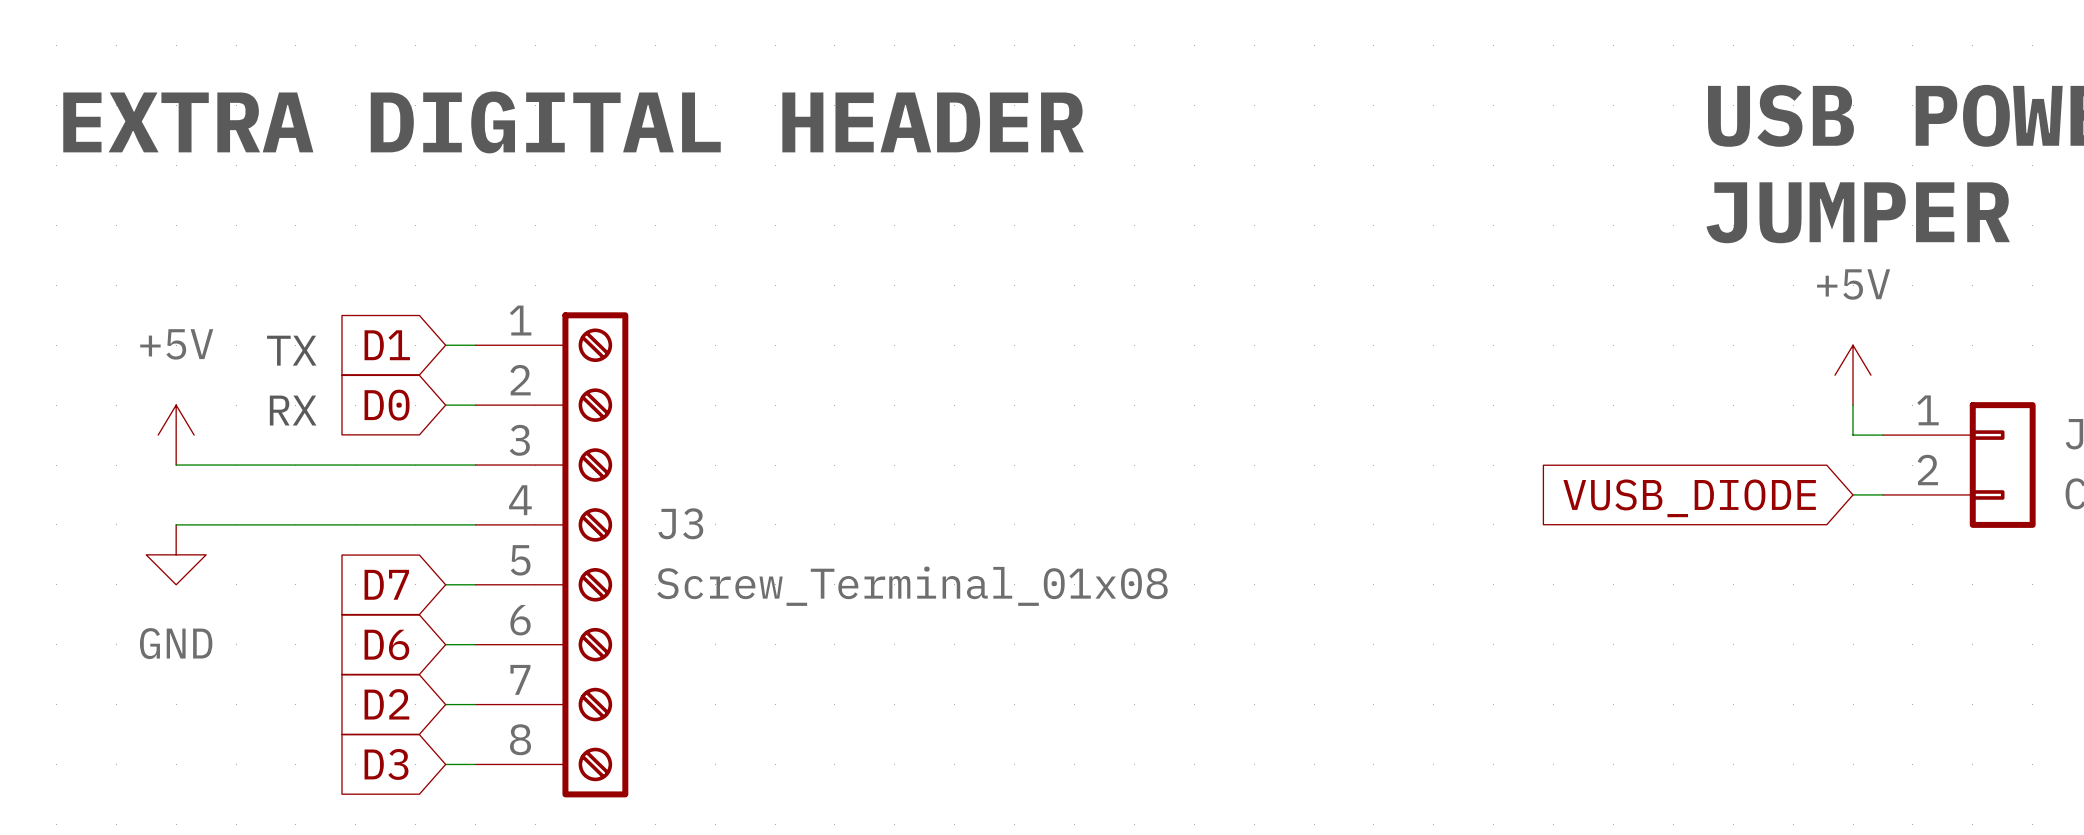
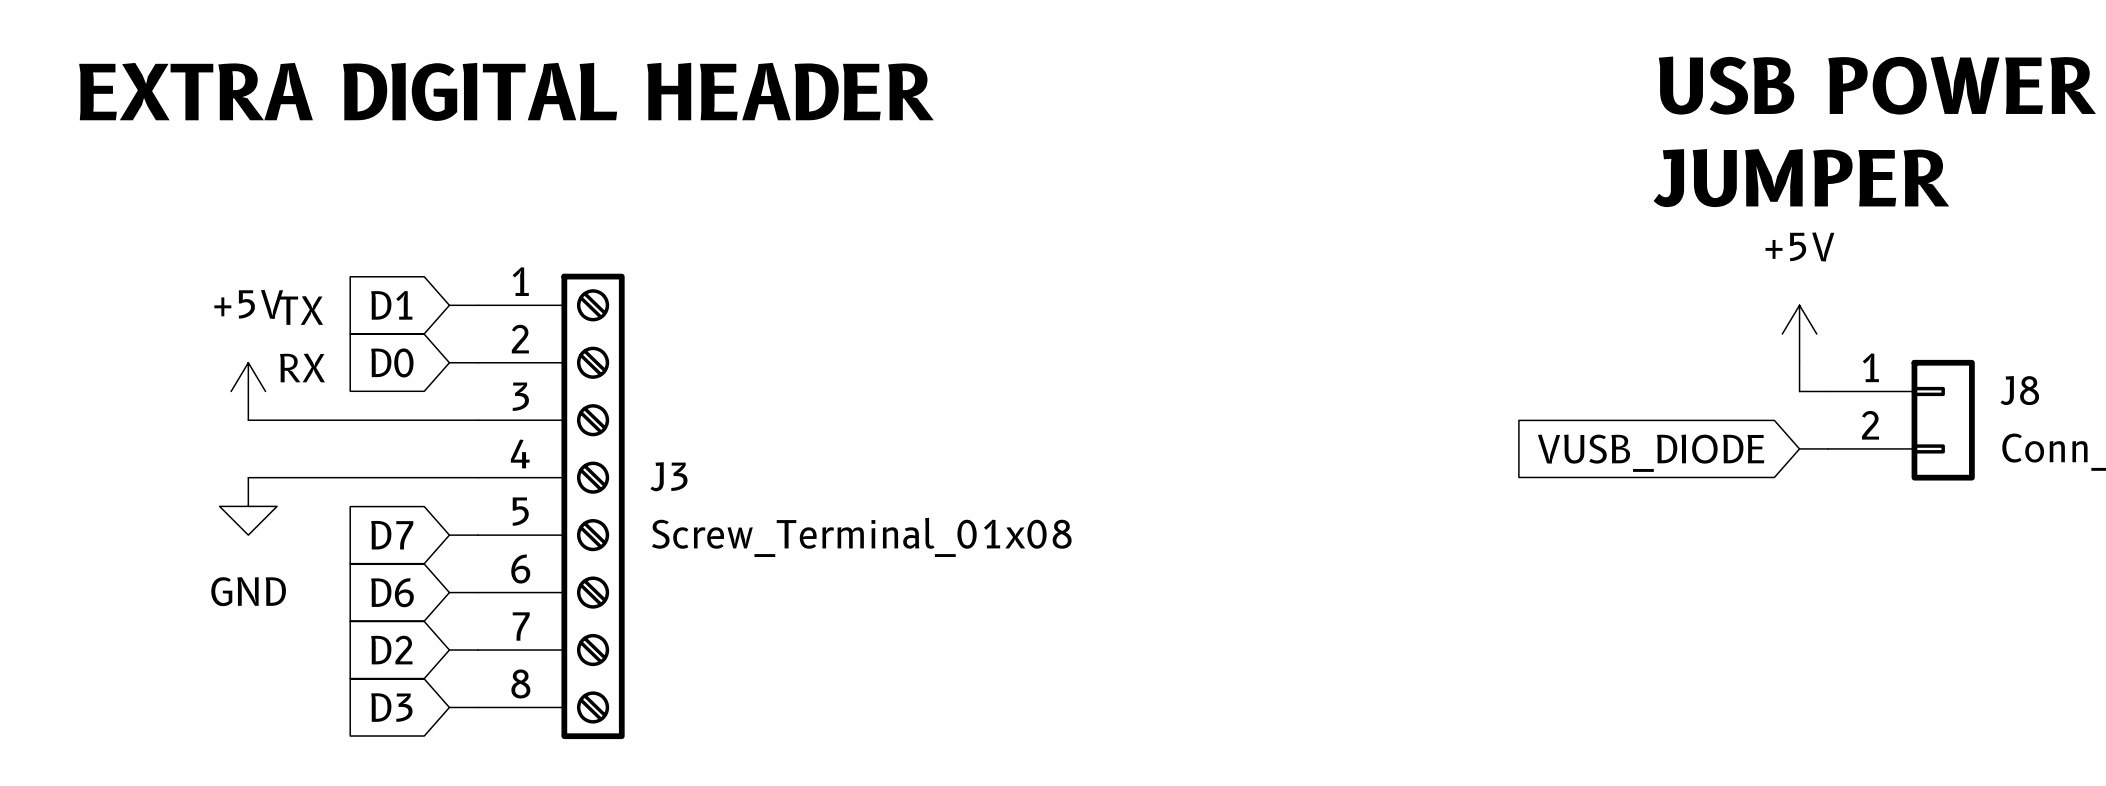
power symbol position: +5V (176, 435) -> +5V (248, 391)
wire: (176, 465) (236, 465) -> none
wire: (176, 524) (236, 524) -> none
power symbol position: GND (176, 554) -> GND (248, 506)

